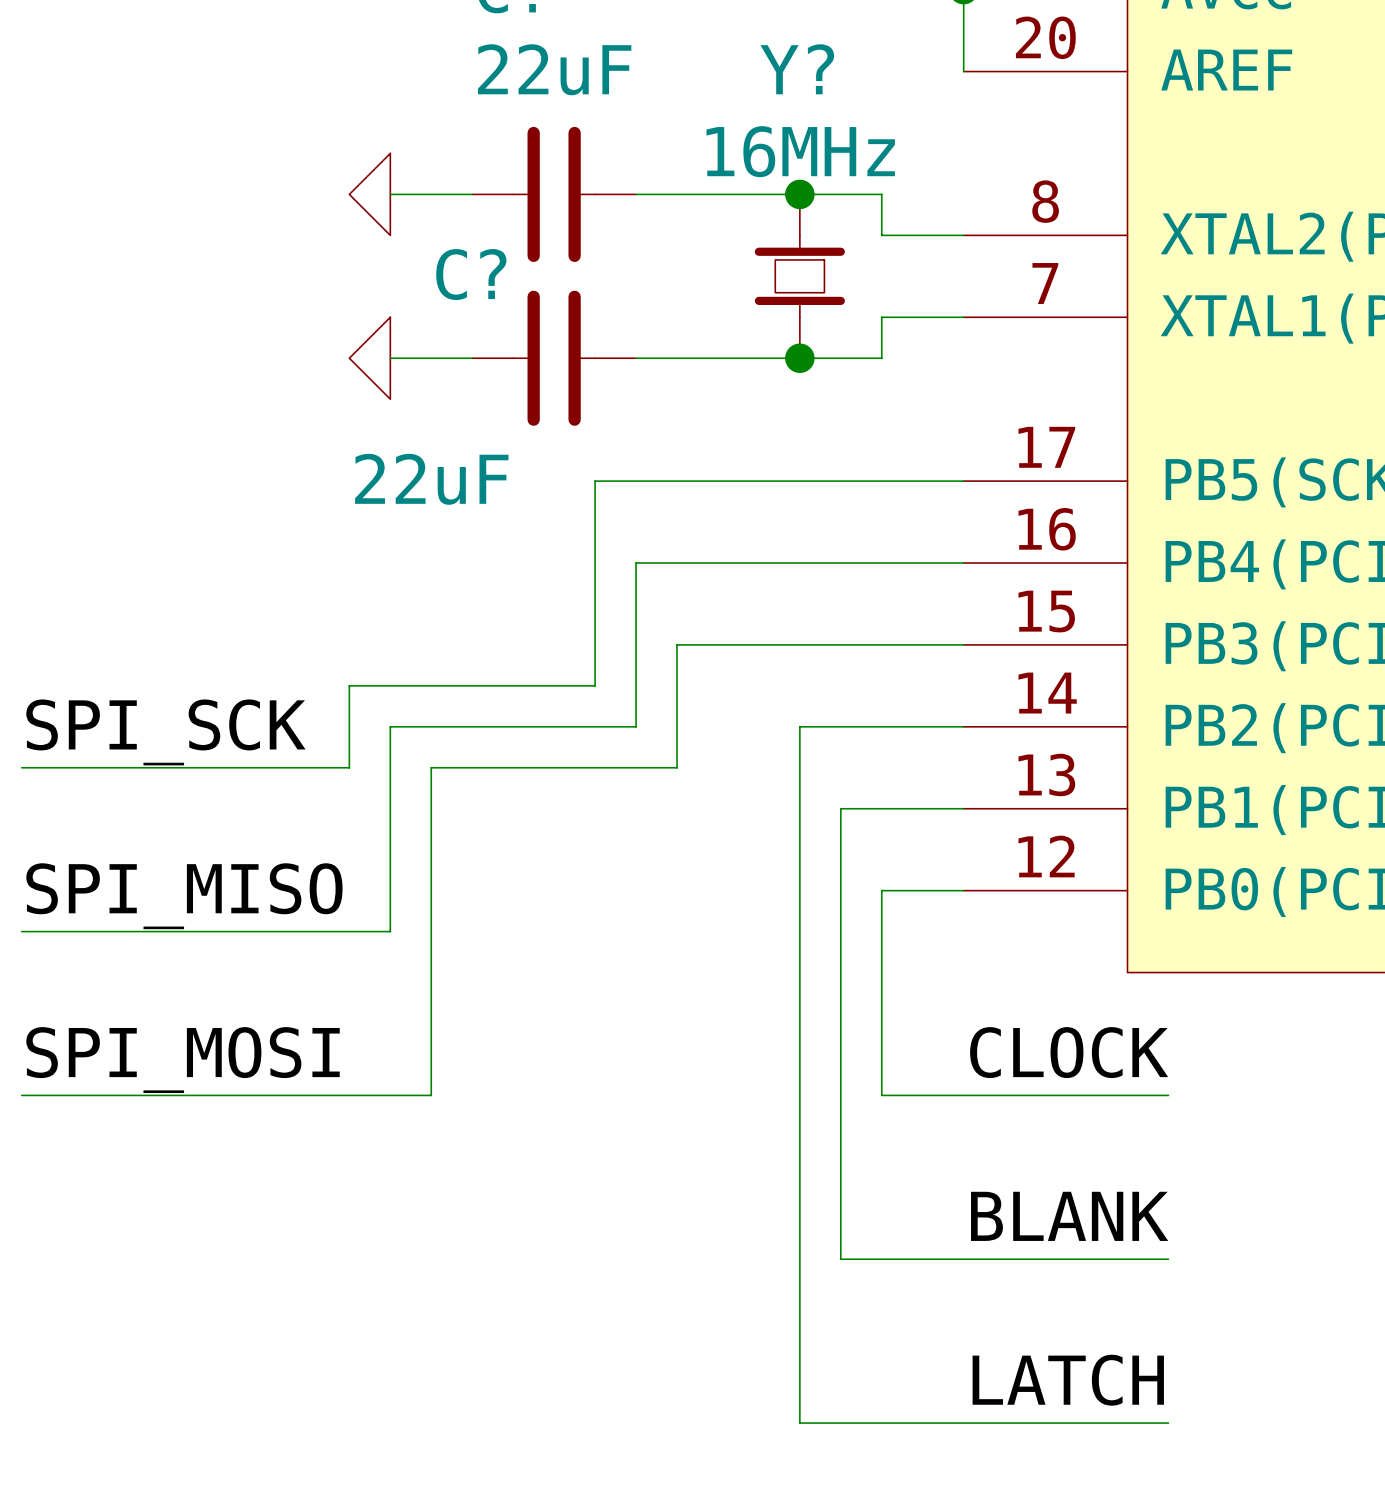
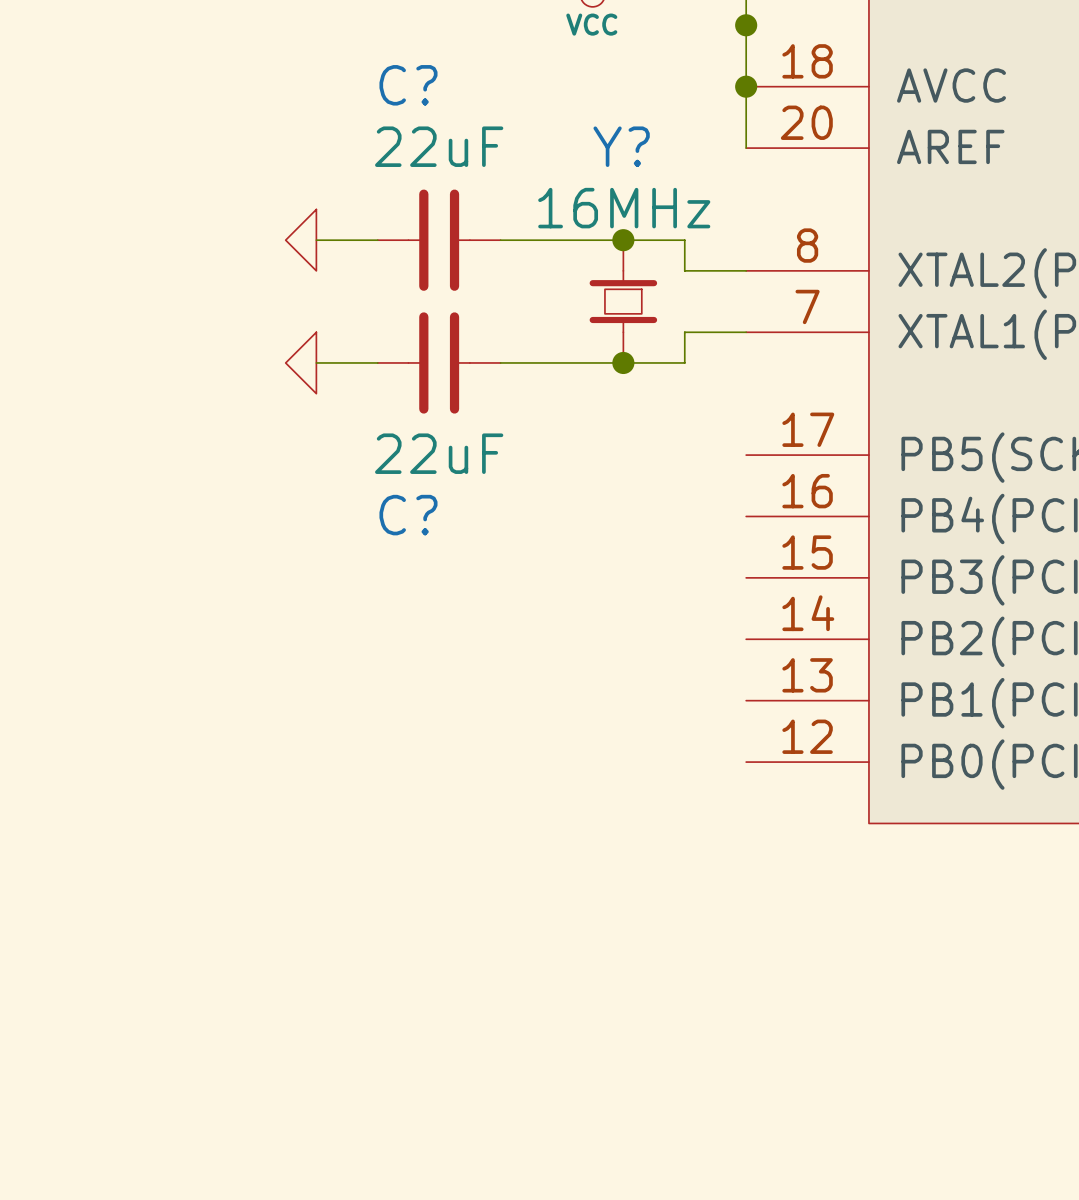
C? name position: C? (471, 274) -> C? (408, 515)
C? value position: 22uF (431, 479) -> 22uF (439, 453)
wire: (963, 481) (595, 481) (595, 685) (349, 685) (349, 767) (21, 767) -> none
wire: (963, 563) (636, 563) (636, 726) (390, 726) (390, 931) (21, 931) -> none
wire: (963, 644) (677, 644) (677, 767) (431, 767) (431, 1095) (21, 1095) -> none
wire: (963, 726) (799, 726) (799, 1423) (1168, 1423) -> none
label: SPI_SCK (165, 732) -> none
wire: (963, 808) (840, 808) (840, 1259) (1168, 1259) -> none
wire: (963, 890) (881, 890) (881, 1095) (1168, 1095) -> none
label: SPI_MISO (184, 896) -> none
label: CLOCK (1069, 1052) -> none
label: SPI_MOSI (183, 1060) -> none
label: BLANK (1069, 1216) -> none
label: LATCH (1068, 1380) -> none

